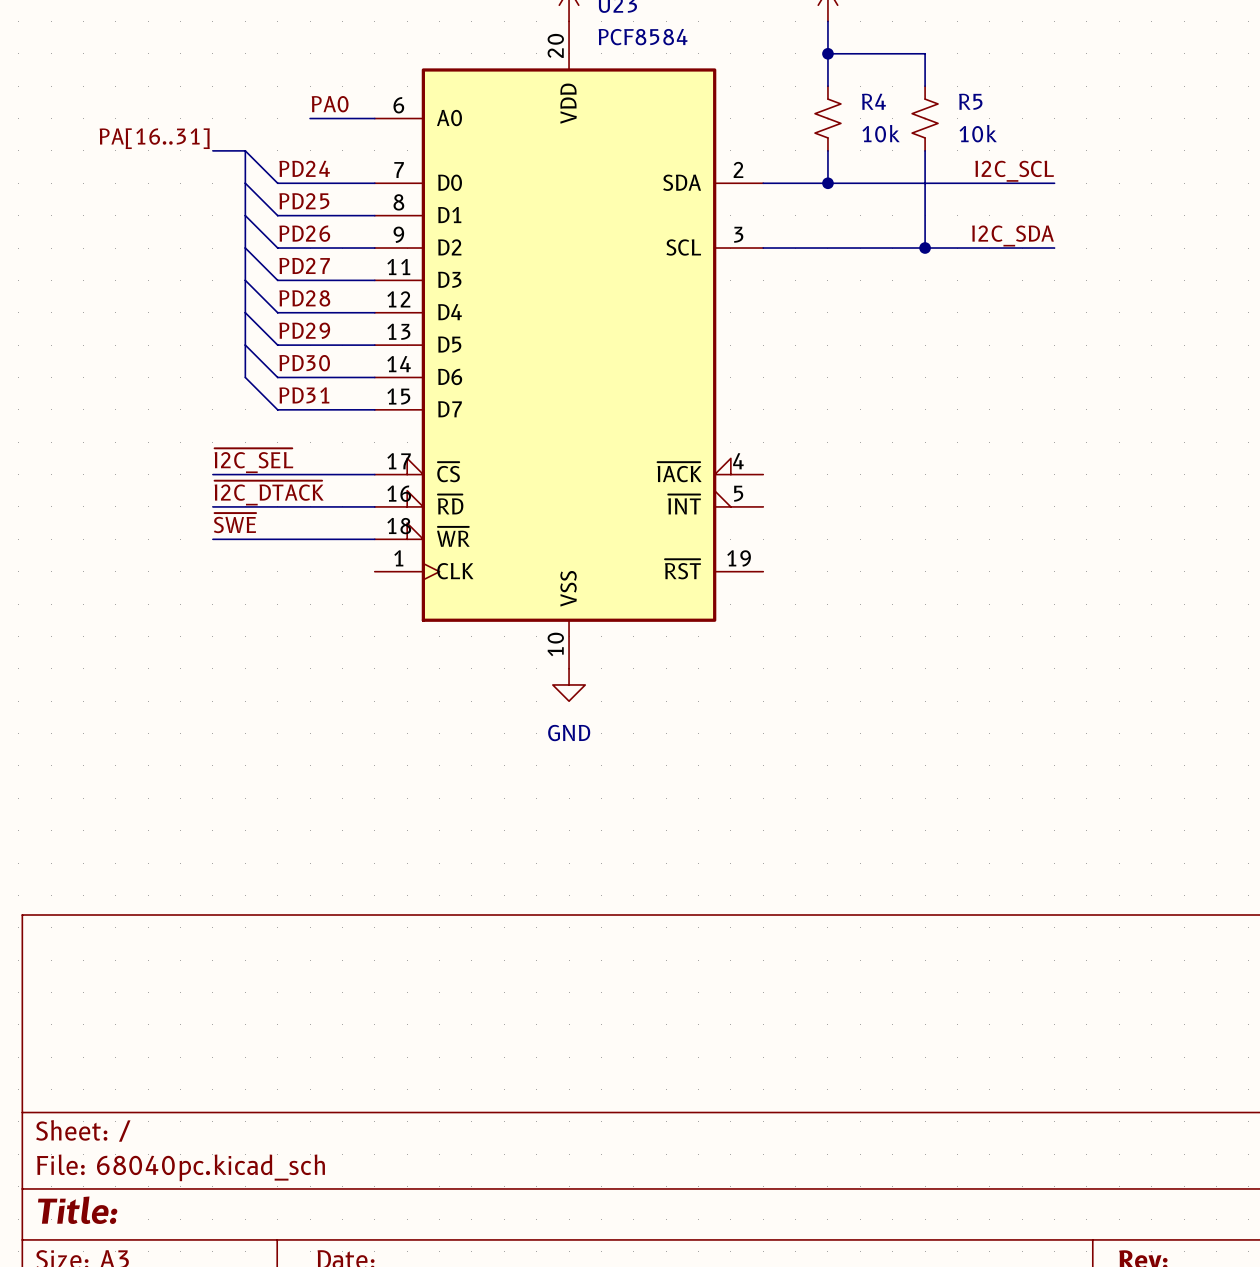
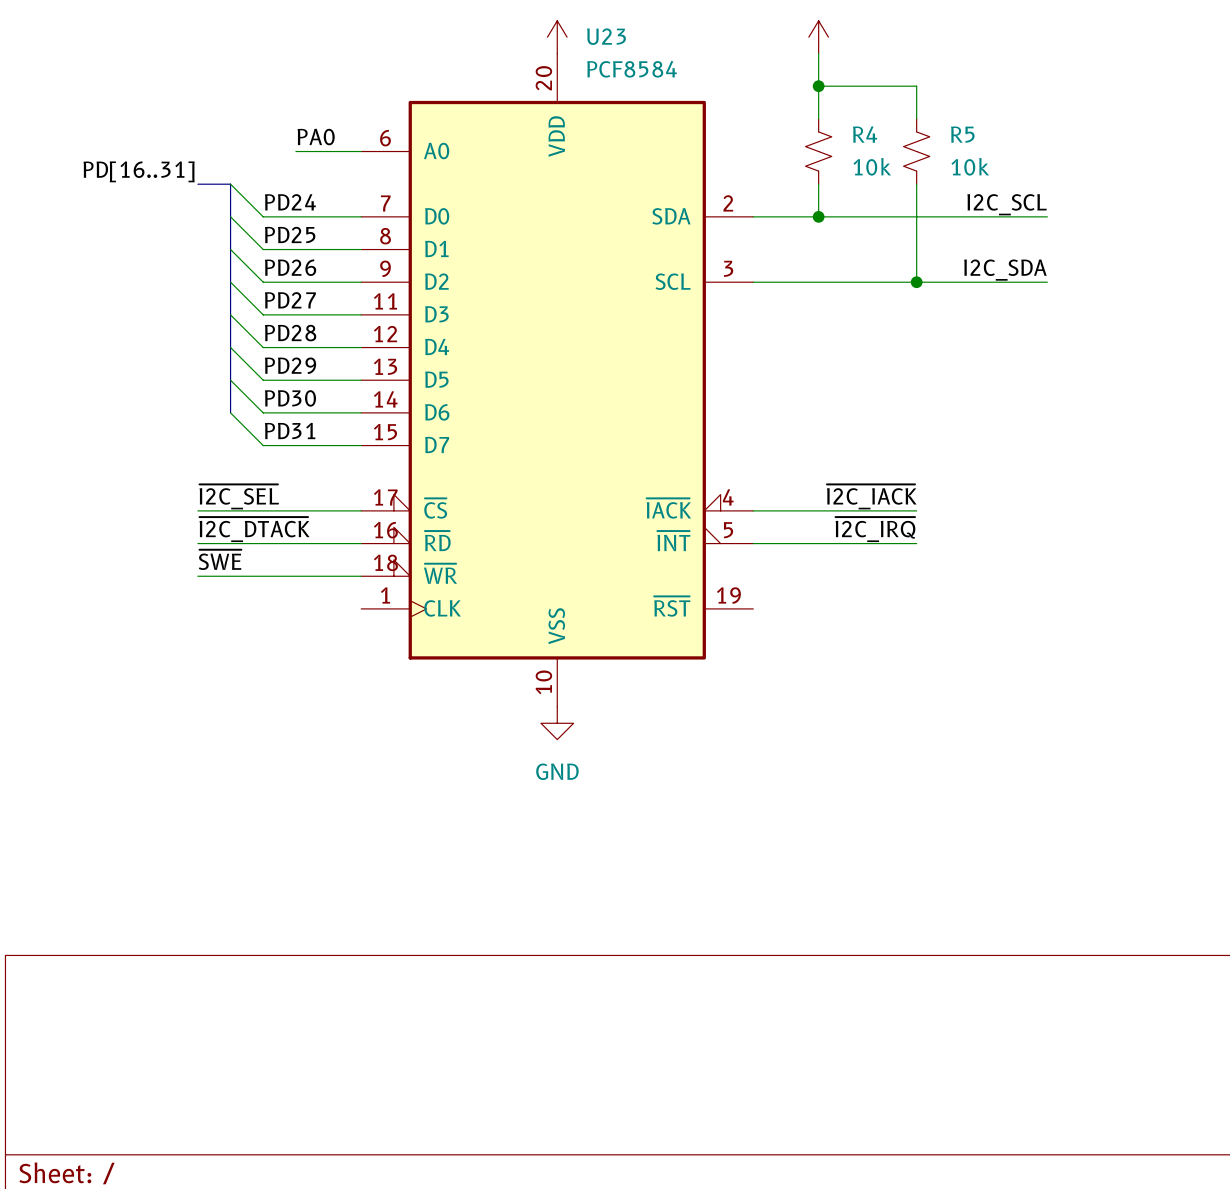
label: PA[16..31] (154, 138) -> PD[16..31] (139, 171)
label: none -> ~{I2C_IACK} (871, 496)
wire: none -> (753, 510) (916, 510)
label: none -> ~{I2C_IRQ} (875, 529)
wire: none -> (753, 543) (916, 543)

